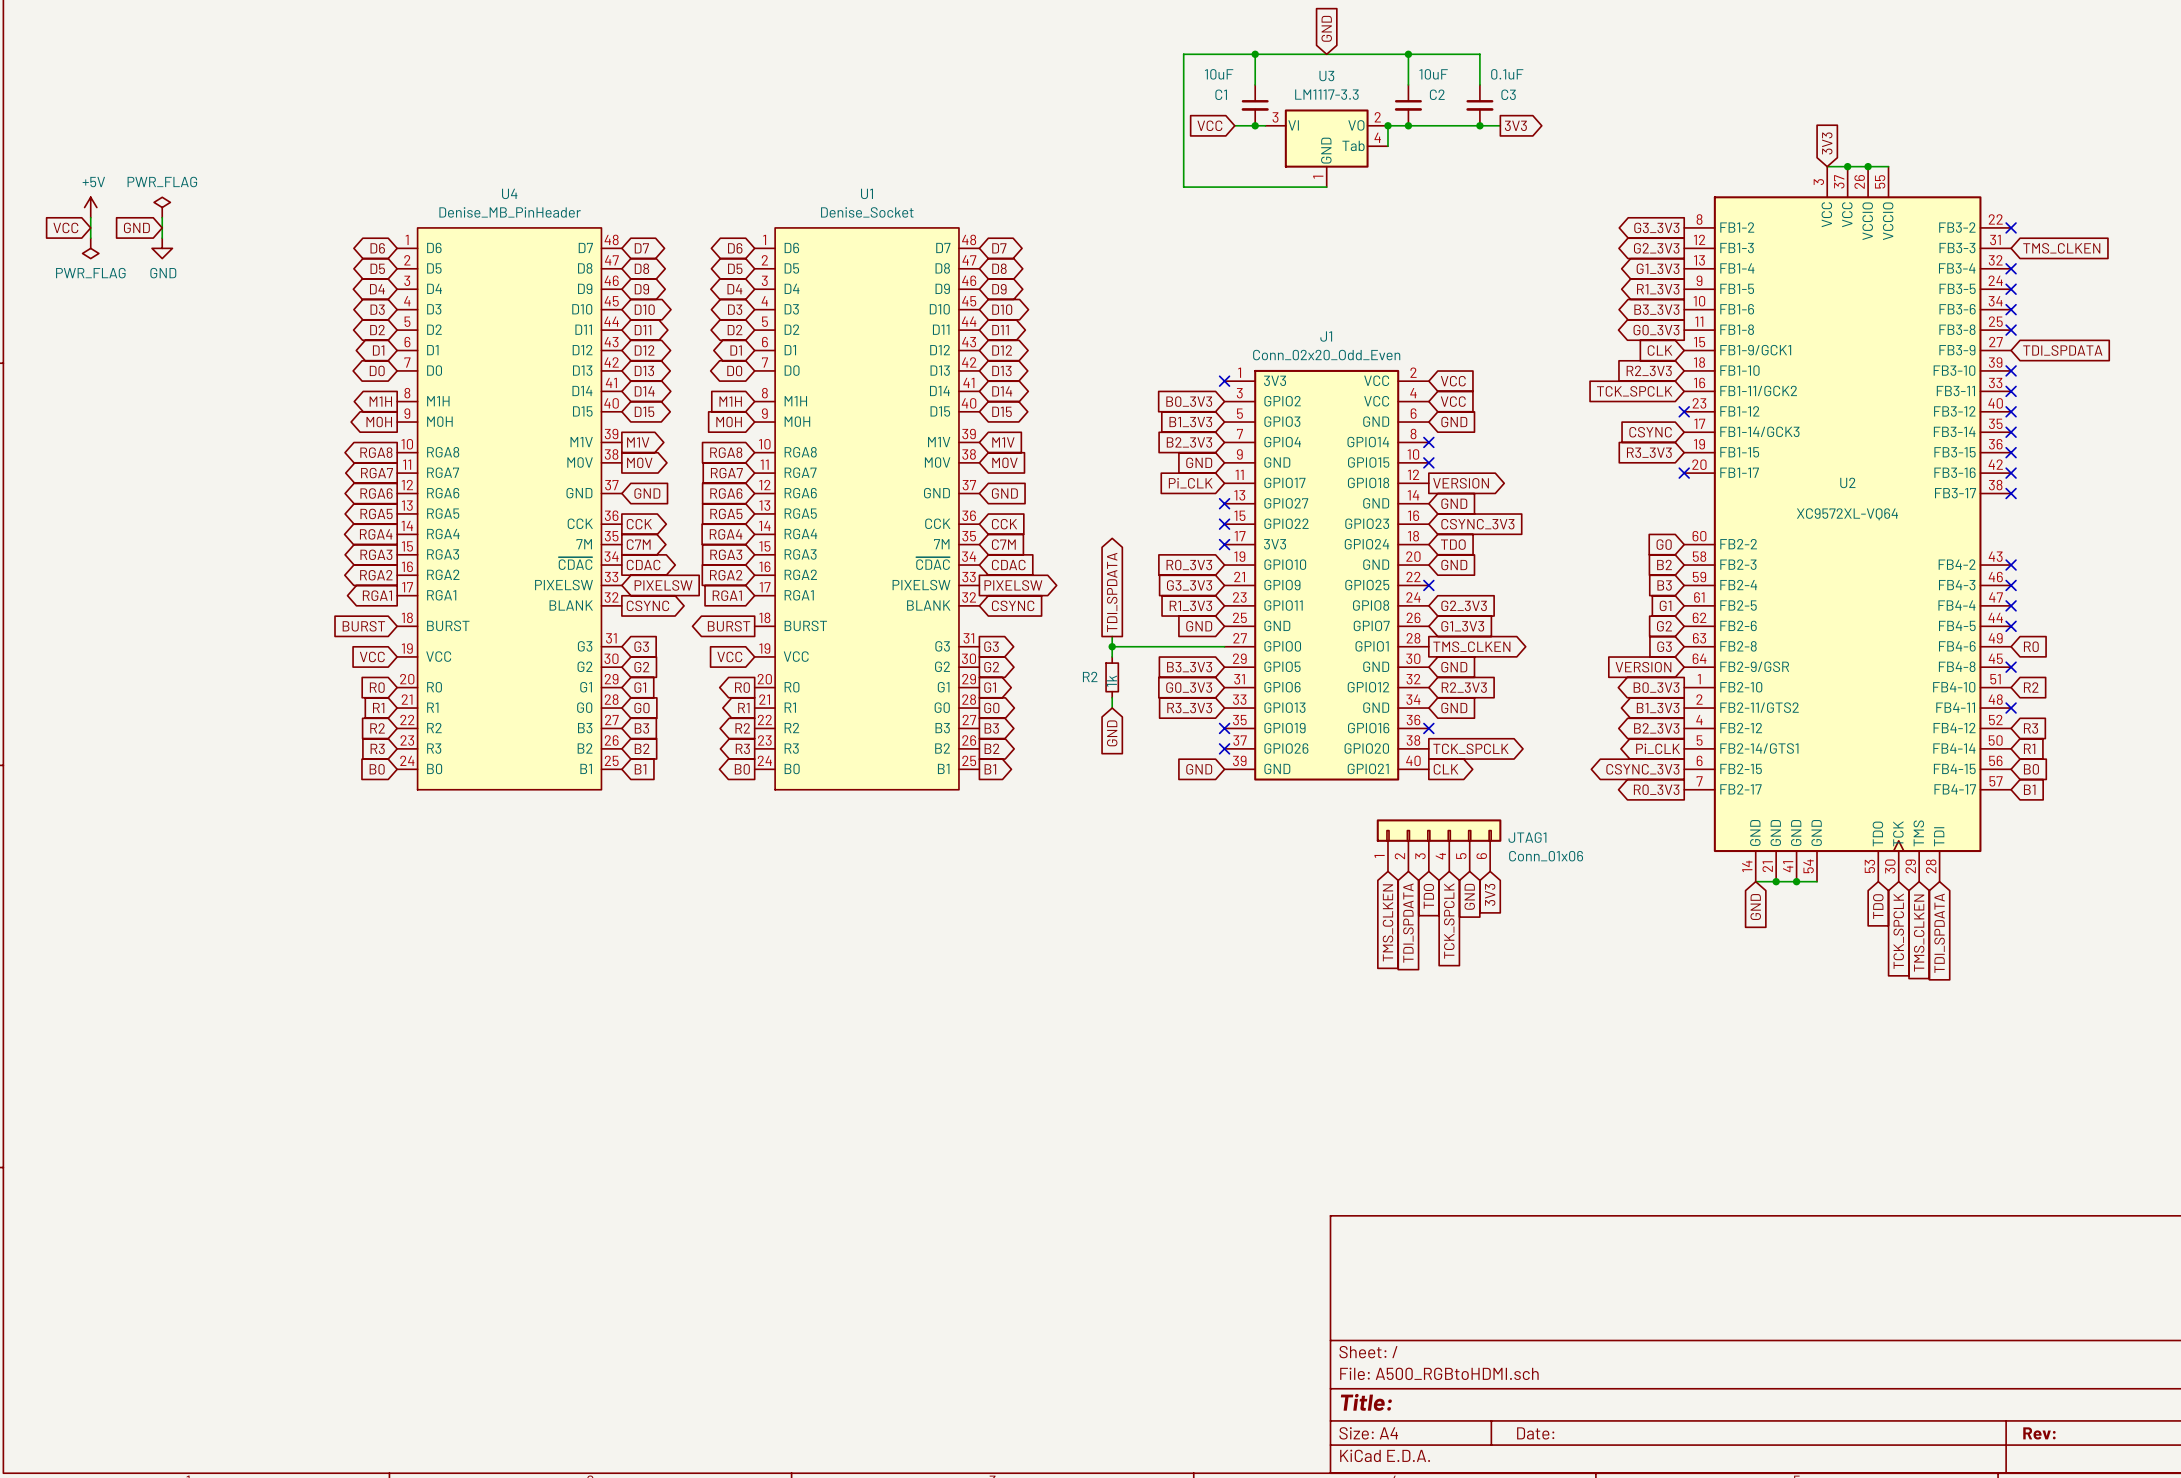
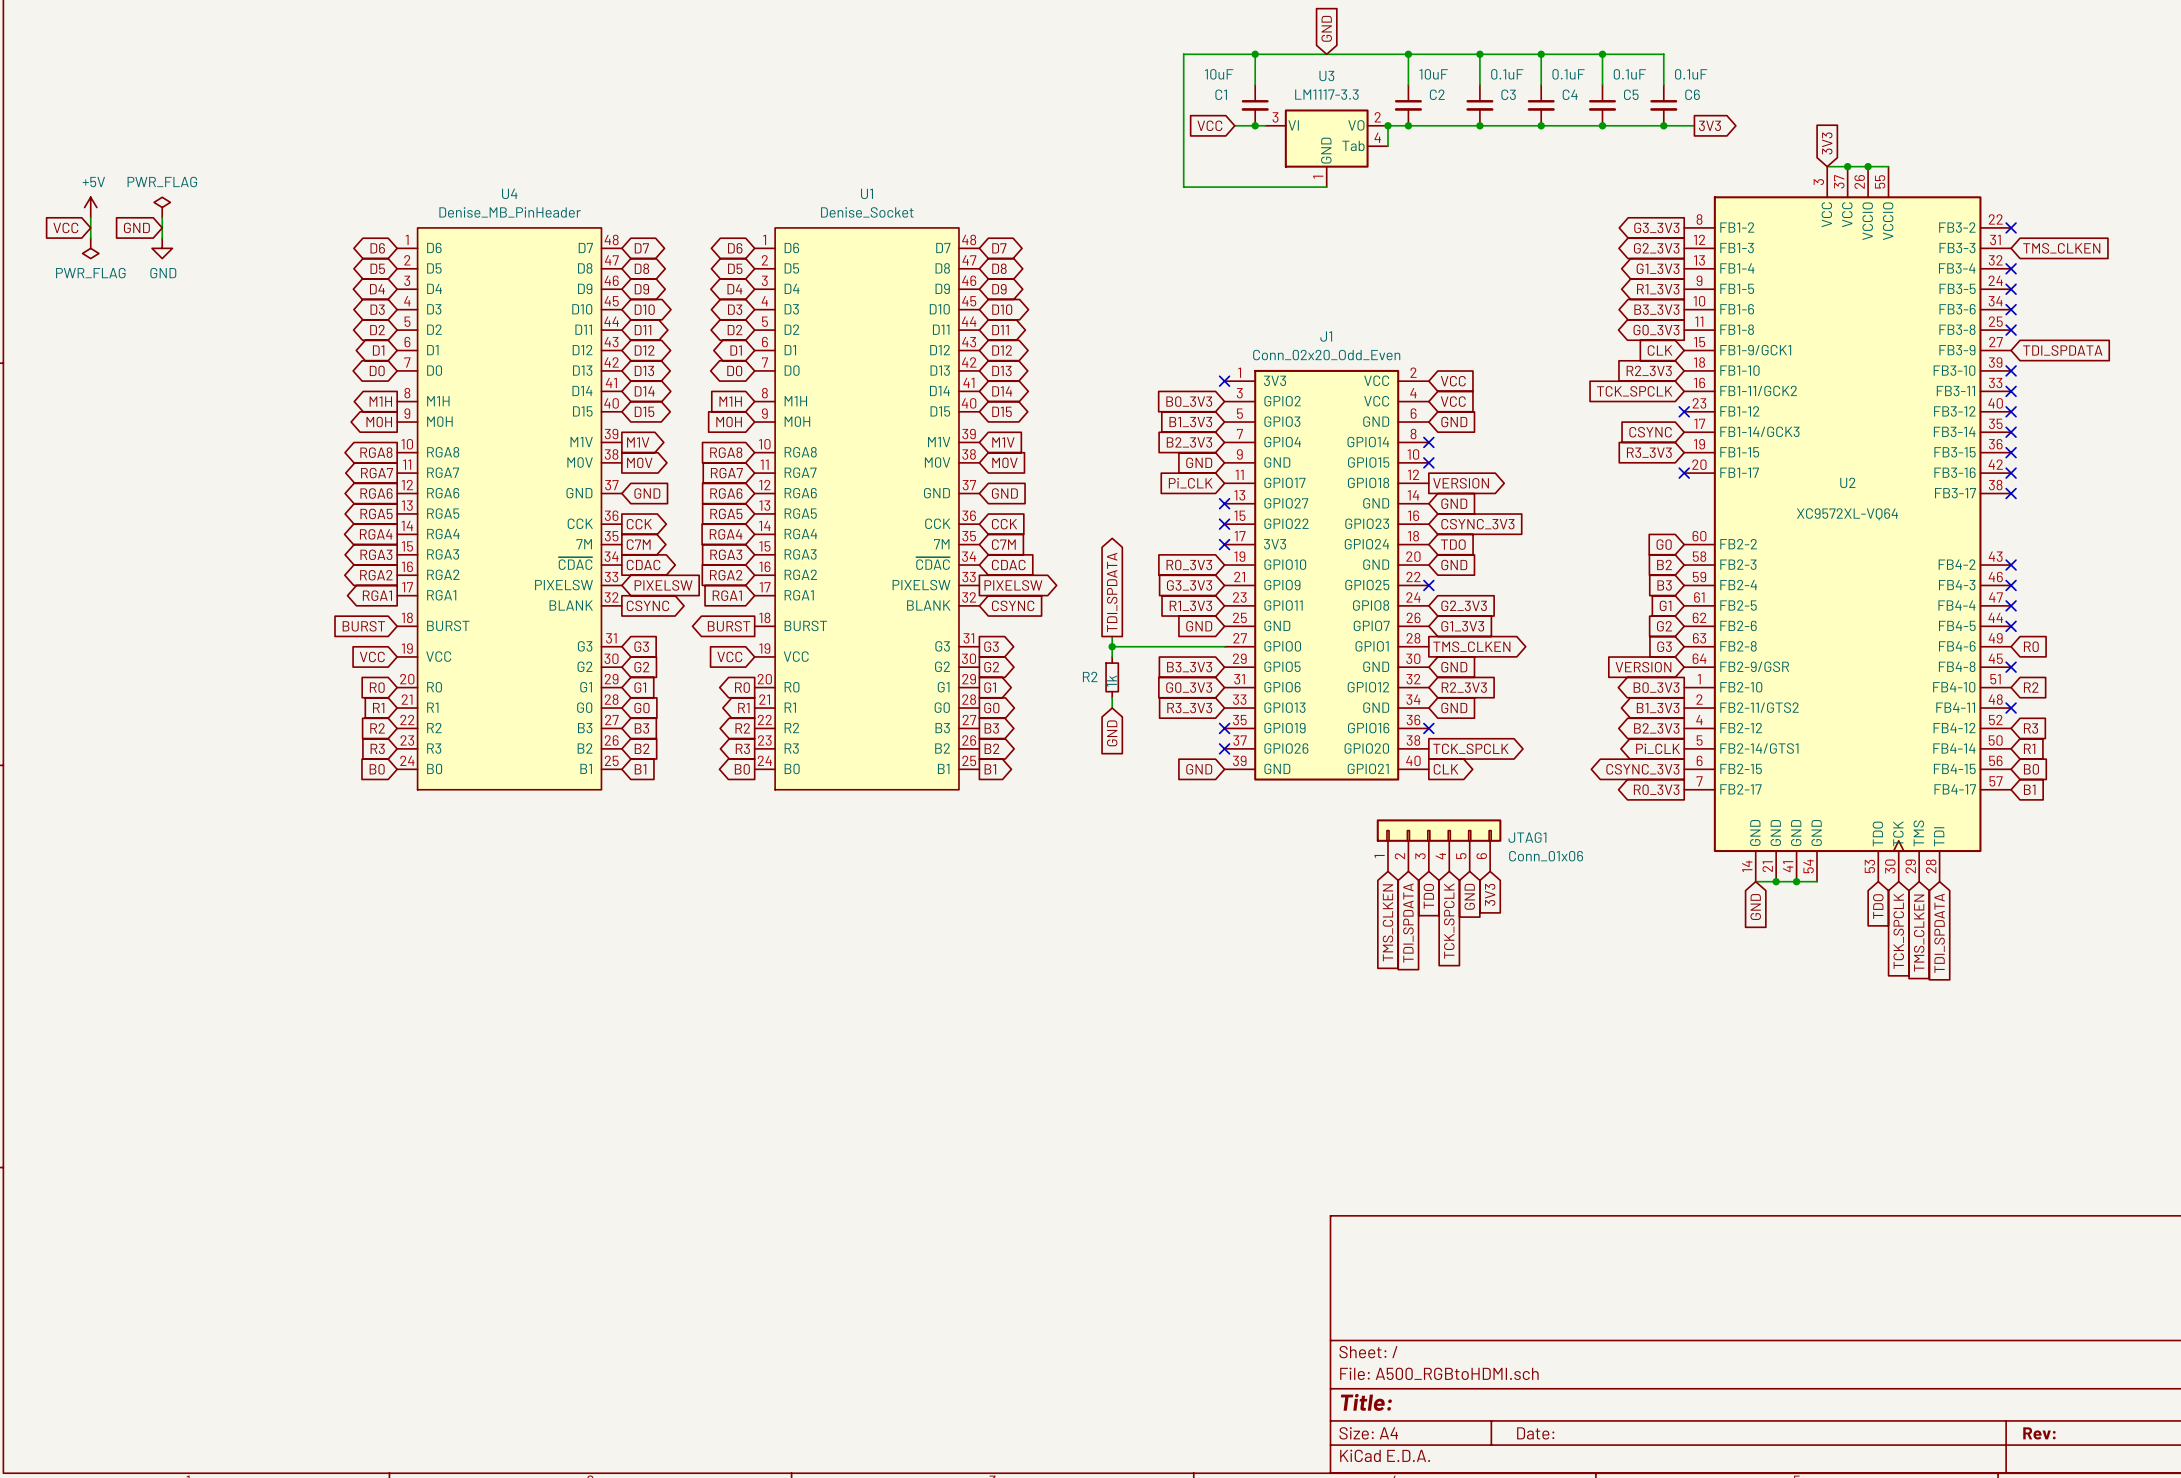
wire: none -> (1479, 54) (1663, 54) (1663, 84)
junction: none -> (1479, 54)
wire: none -> (1541, 54) (1541, 84)
junction: none -> (1541, 54)
wire: none -> (1602, 54) (1602, 84)
junction: none -> (1602, 54)
C4: none -> 0.1uF (1541, 105)
C5: none -> 0.1uF (1602, 105)
C6: none -> 0.1uF (1663, 105)
wire: none -> (1500, 125) (1694, 125)
global label position: 3V3 (1515, 125) -> 3V3 (1709, 125)
junction: none -> (1541, 125)
junction: none -> (1602, 125)
junction: none -> (1663, 125)

